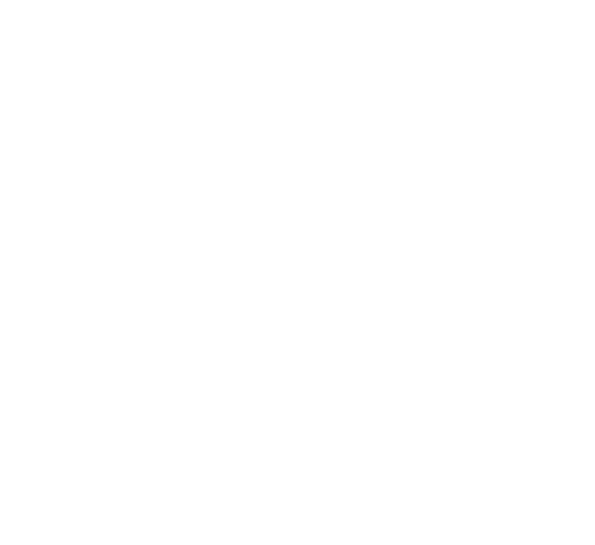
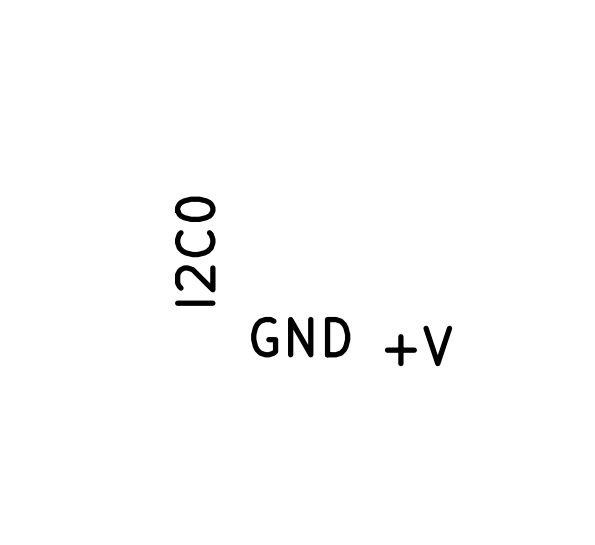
text: none -> I2C0 (195, 251)
text: none -> GND (300, 337)
text: none -> +V (418, 345)

